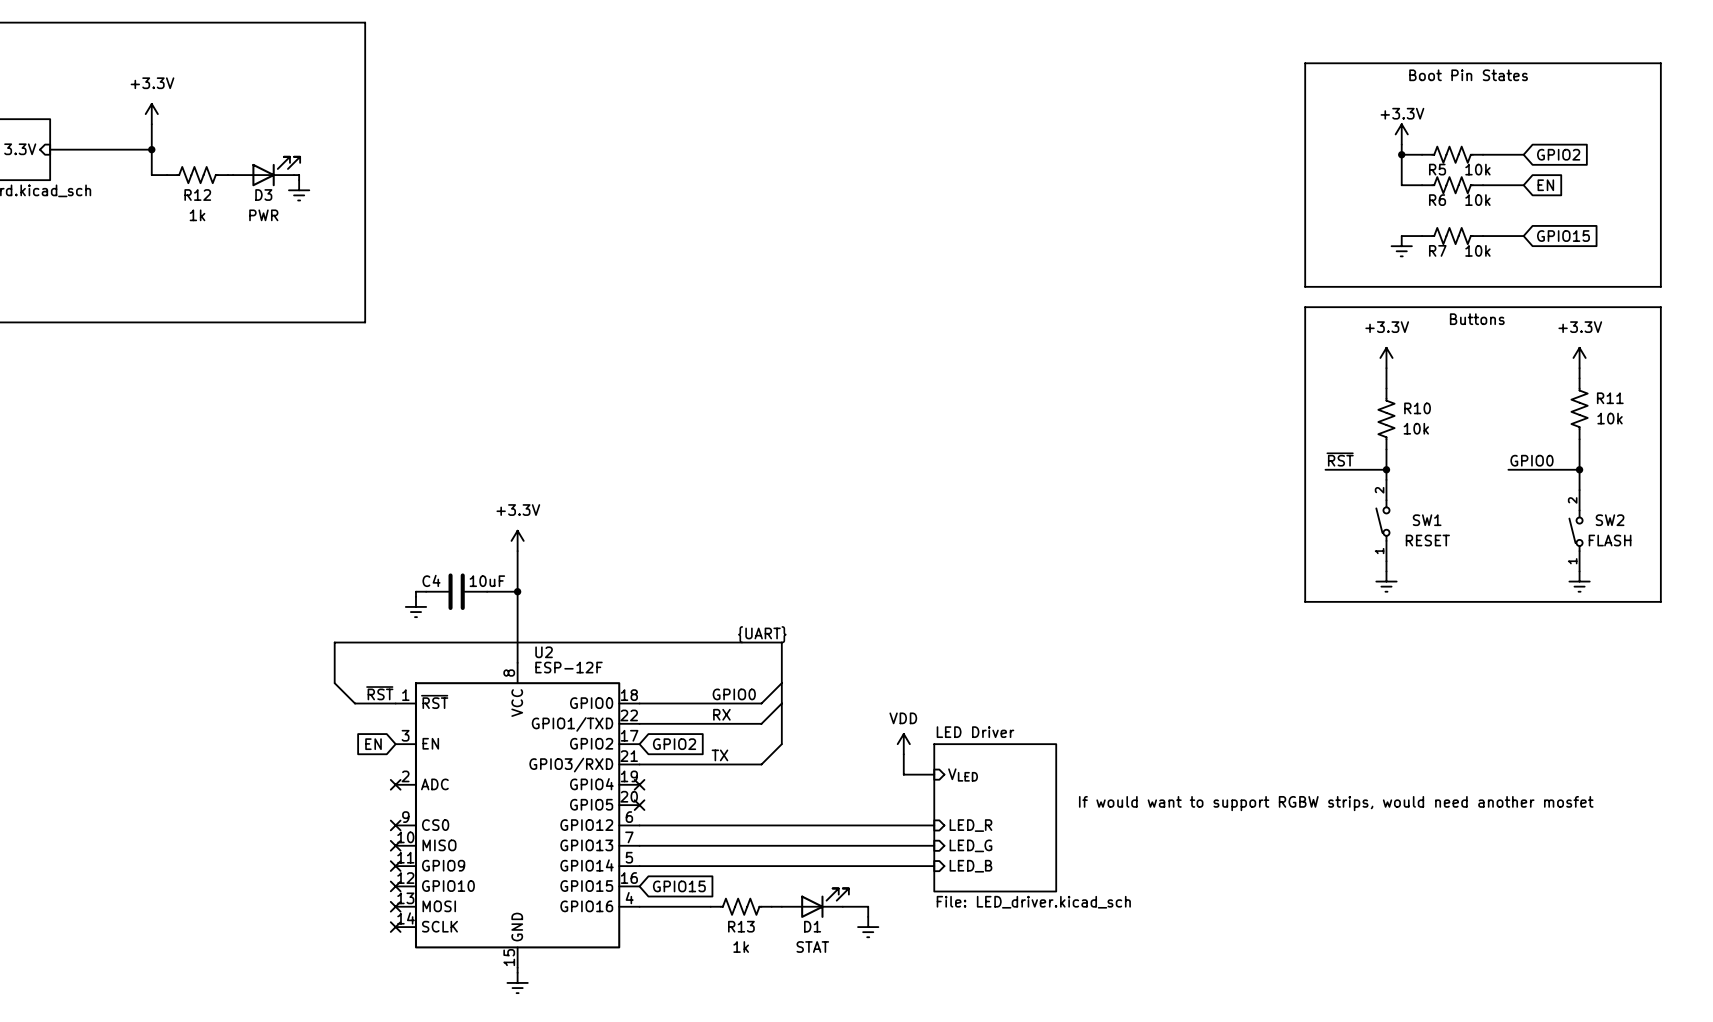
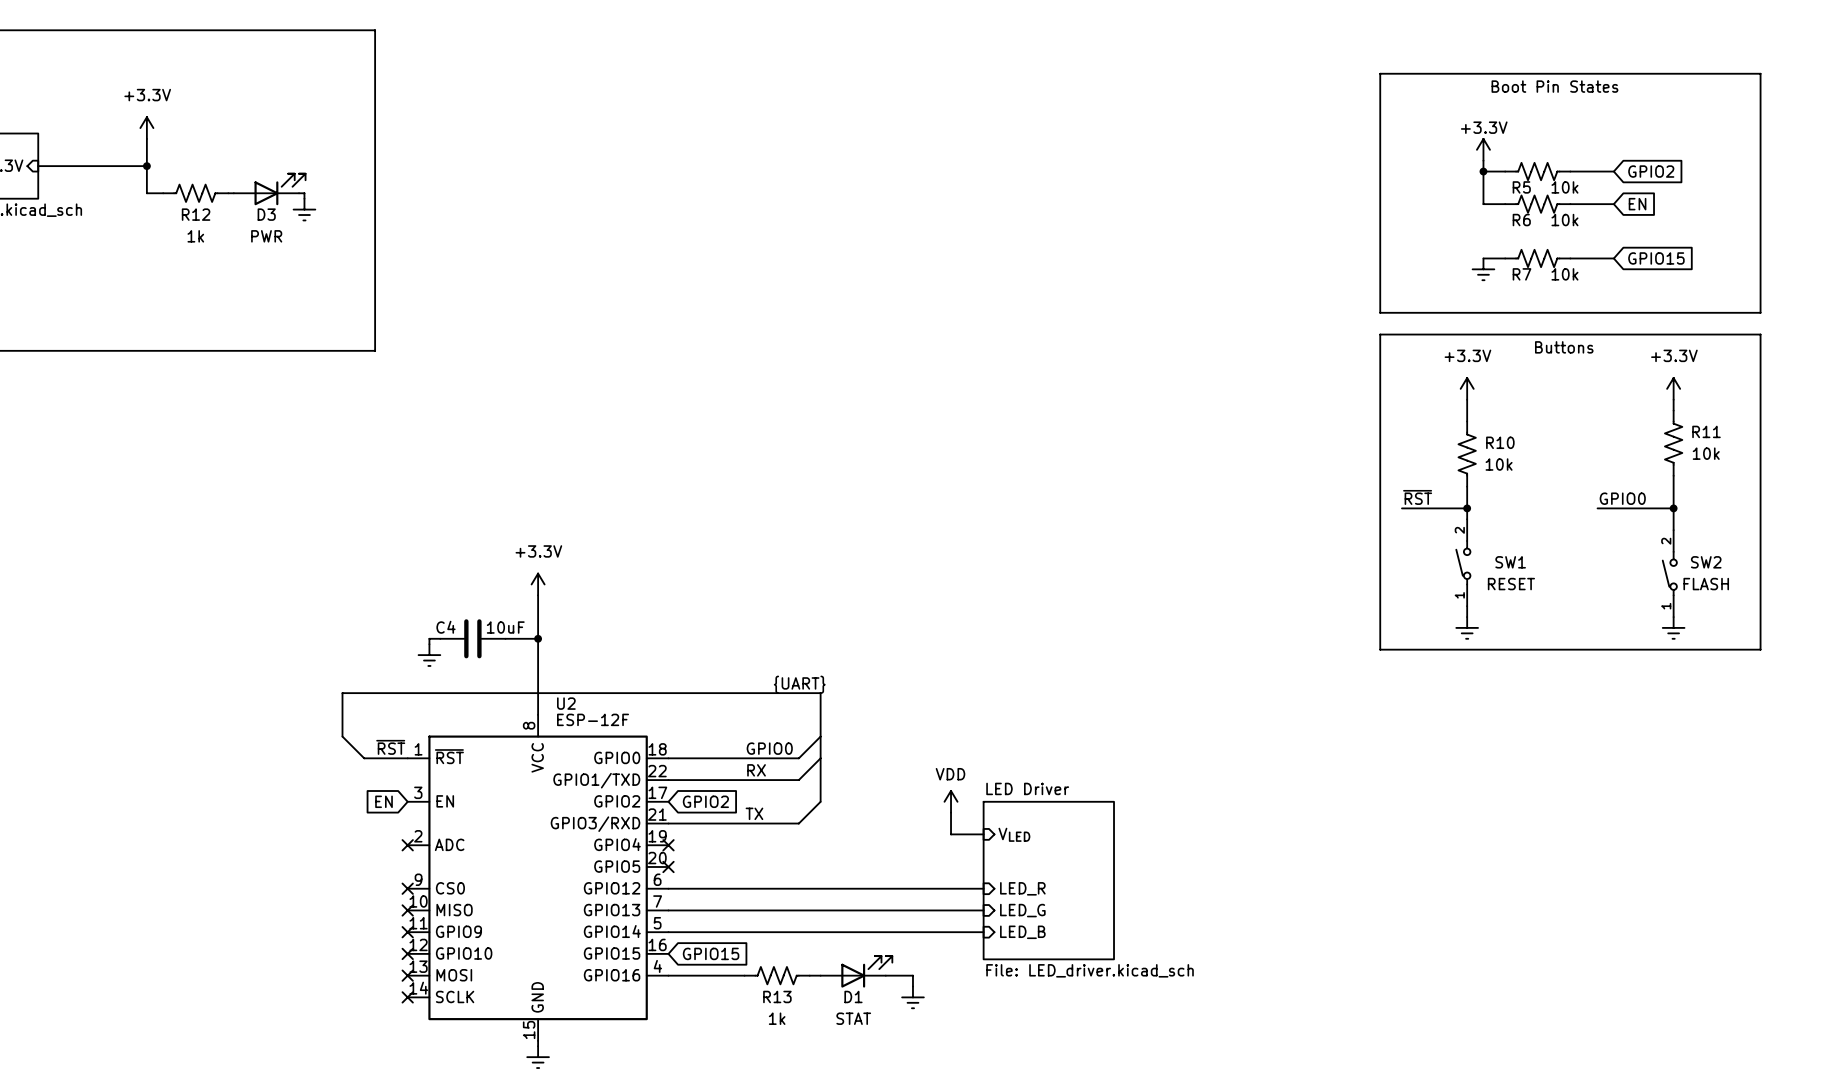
text: If would want to support RGBW strips, would need another mosfet (1336, 803) -> none

